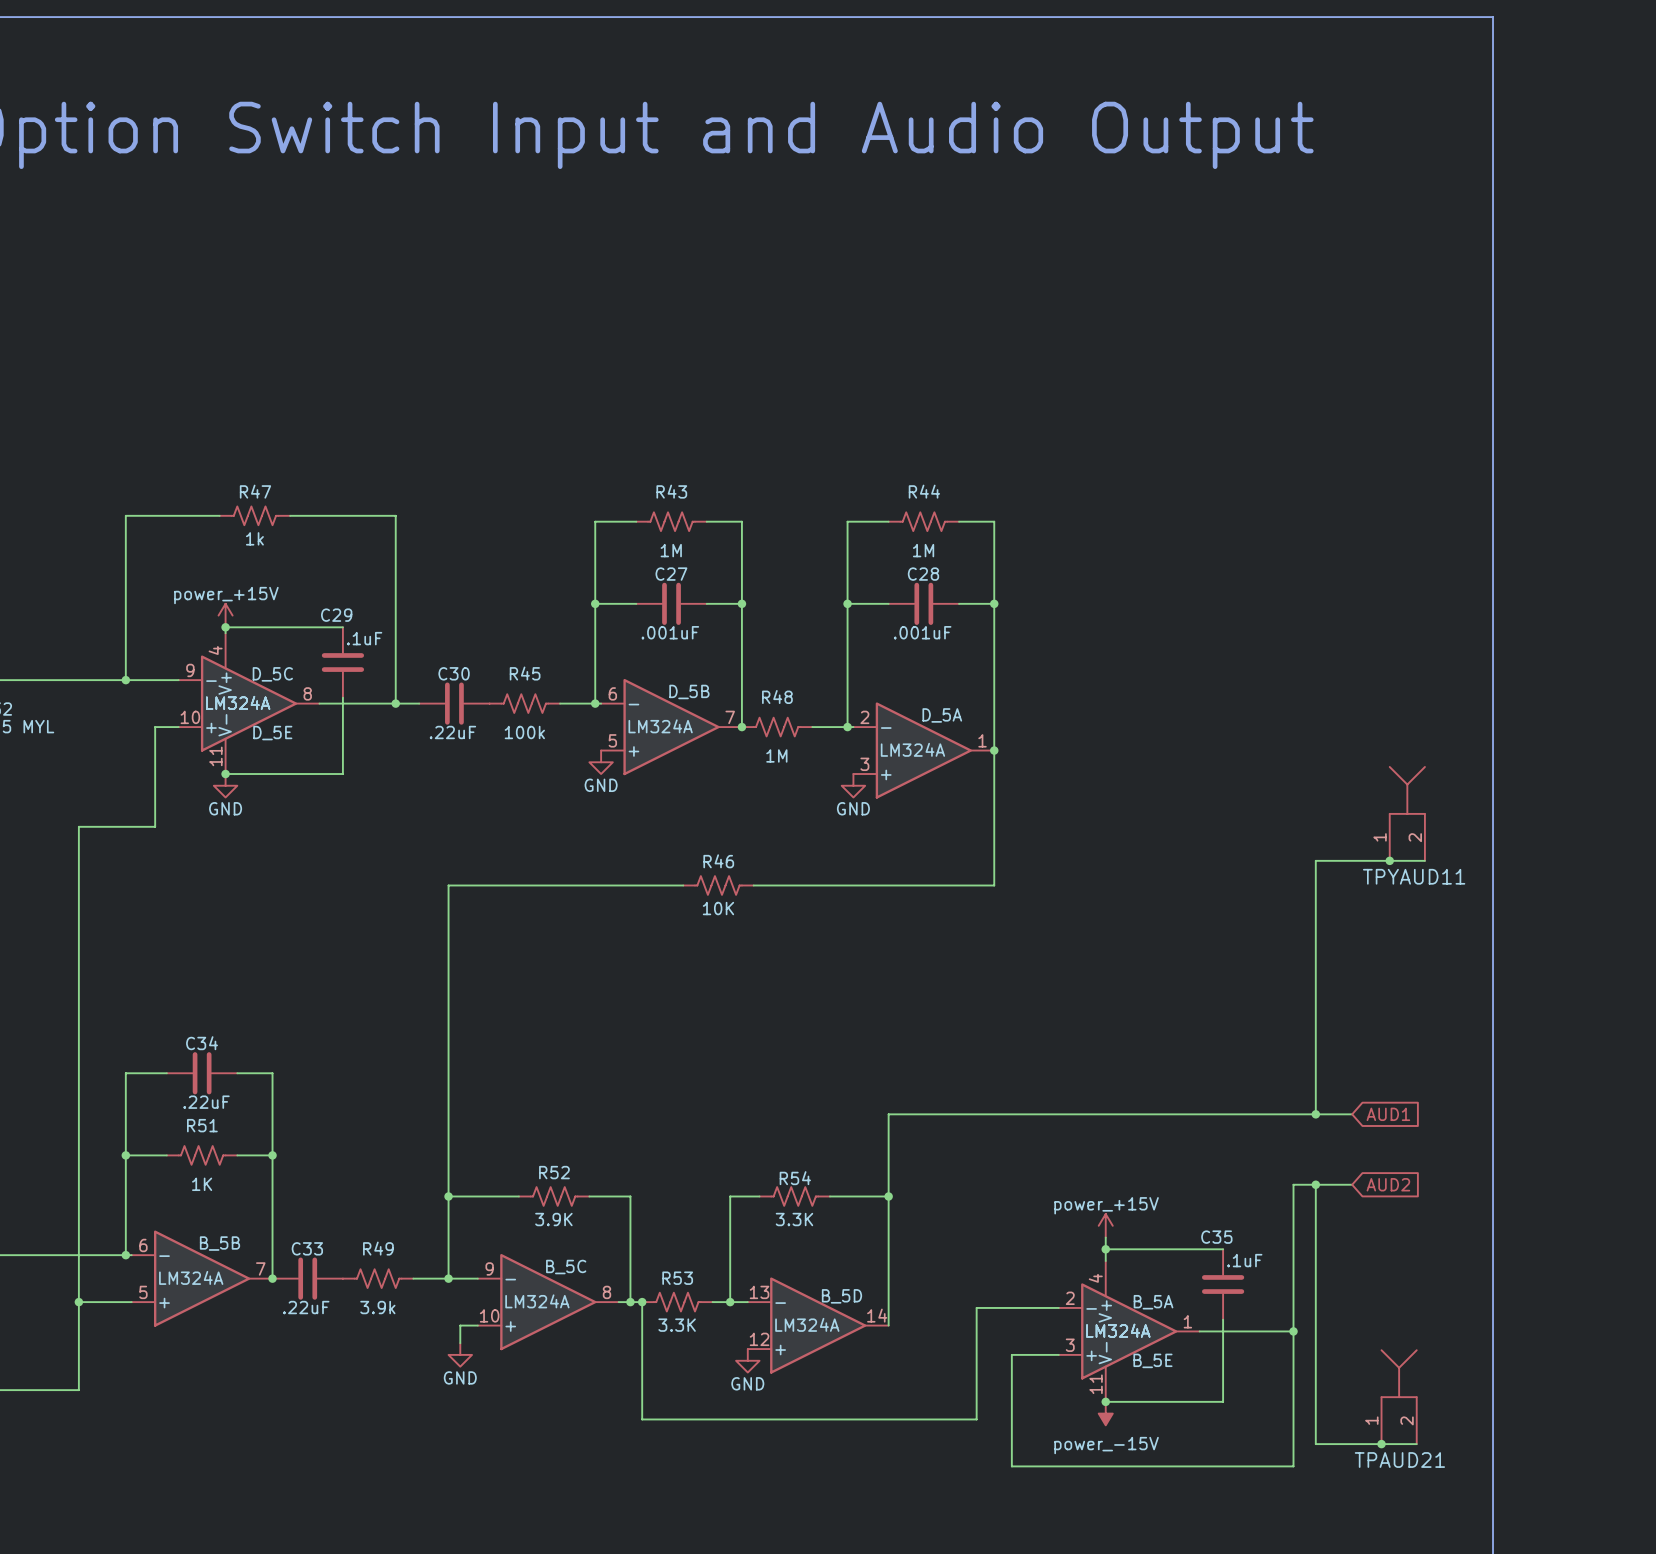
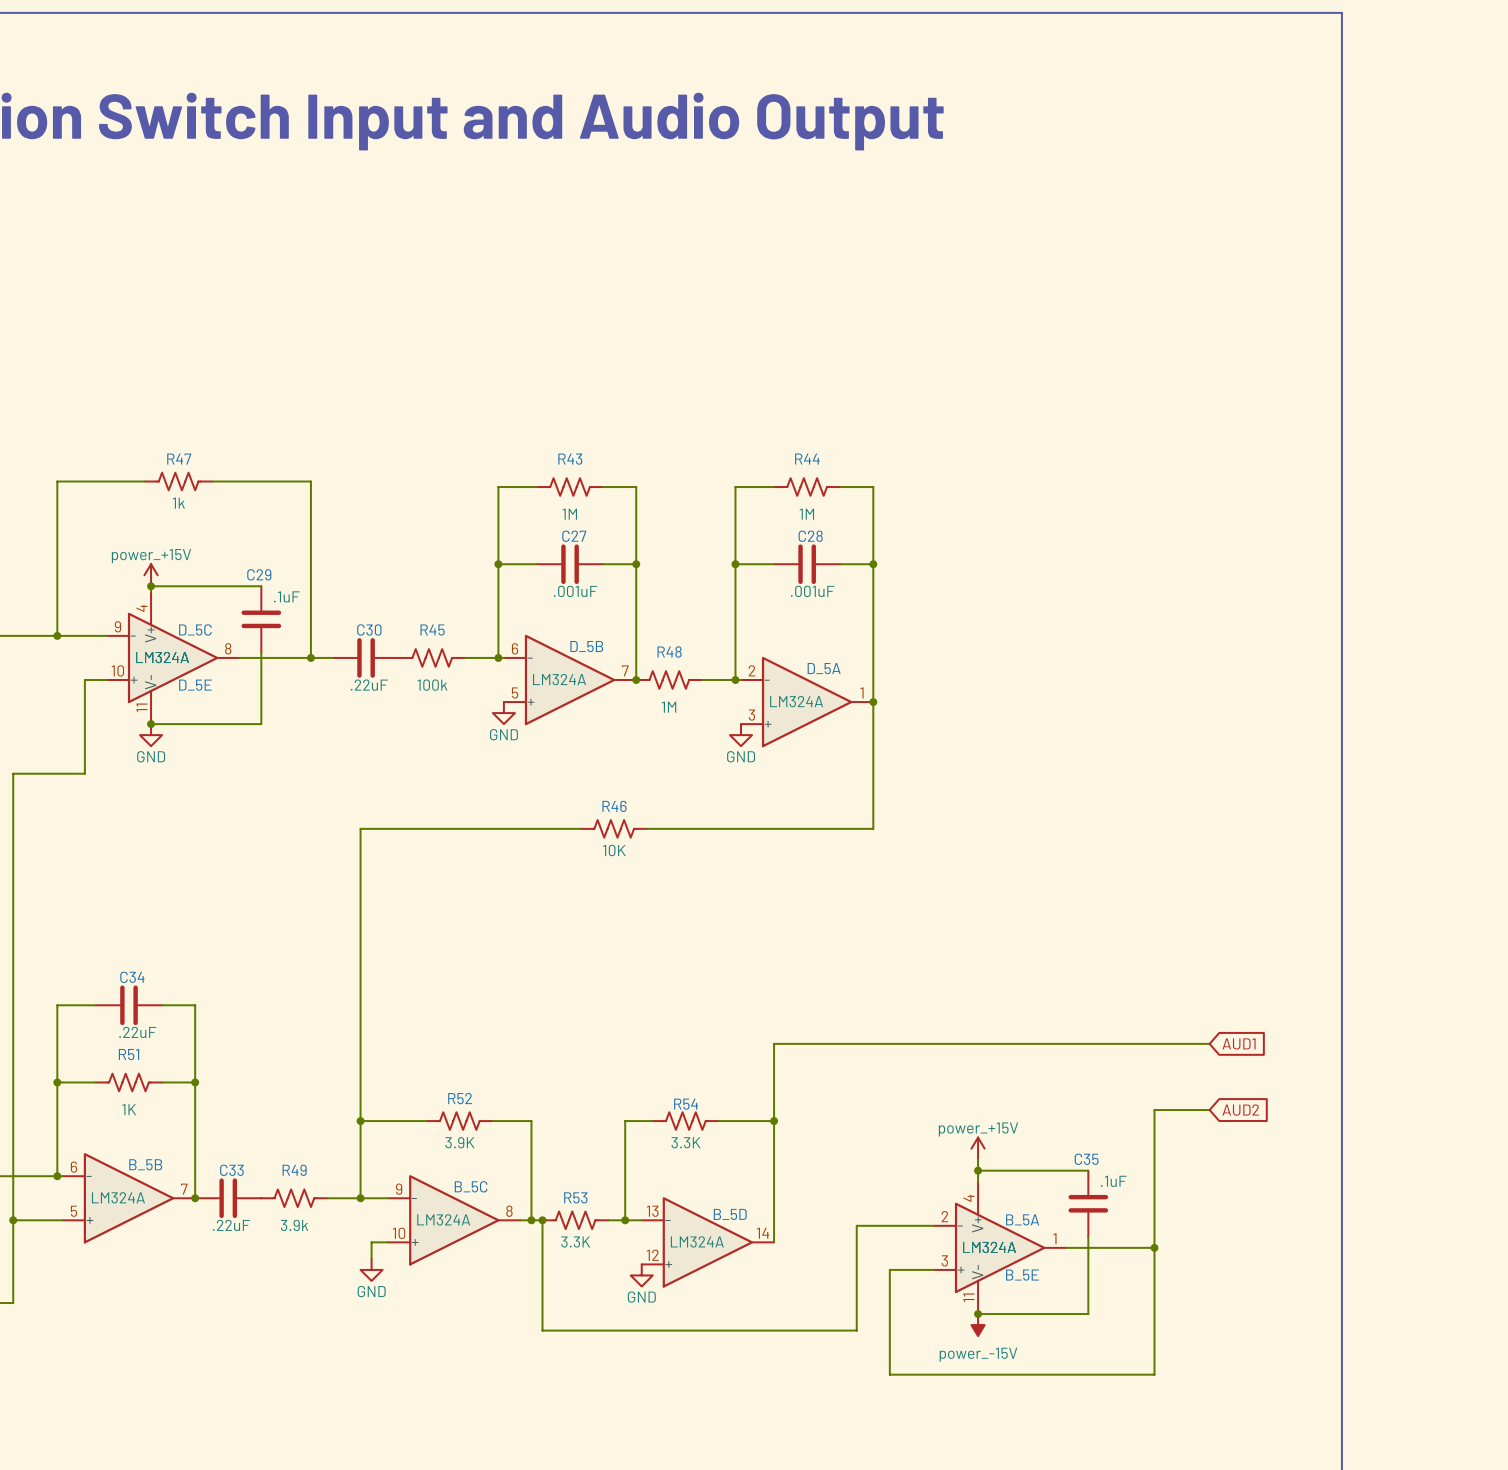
TPYAUD11: (1407, 813) -> none
junction: (1389, 860) -> none
wire: (1424, 860) (1315, 860) (1315, 1114) -> none
junction: (1315, 1114) -> none
wire: (1315, 1184) (1315, 1444) (1416, 1444) -> none
junction: (1315, 1184) -> none
TPAUD21: (1399, 1397) -> none
junction: (1381, 1444) -> none

